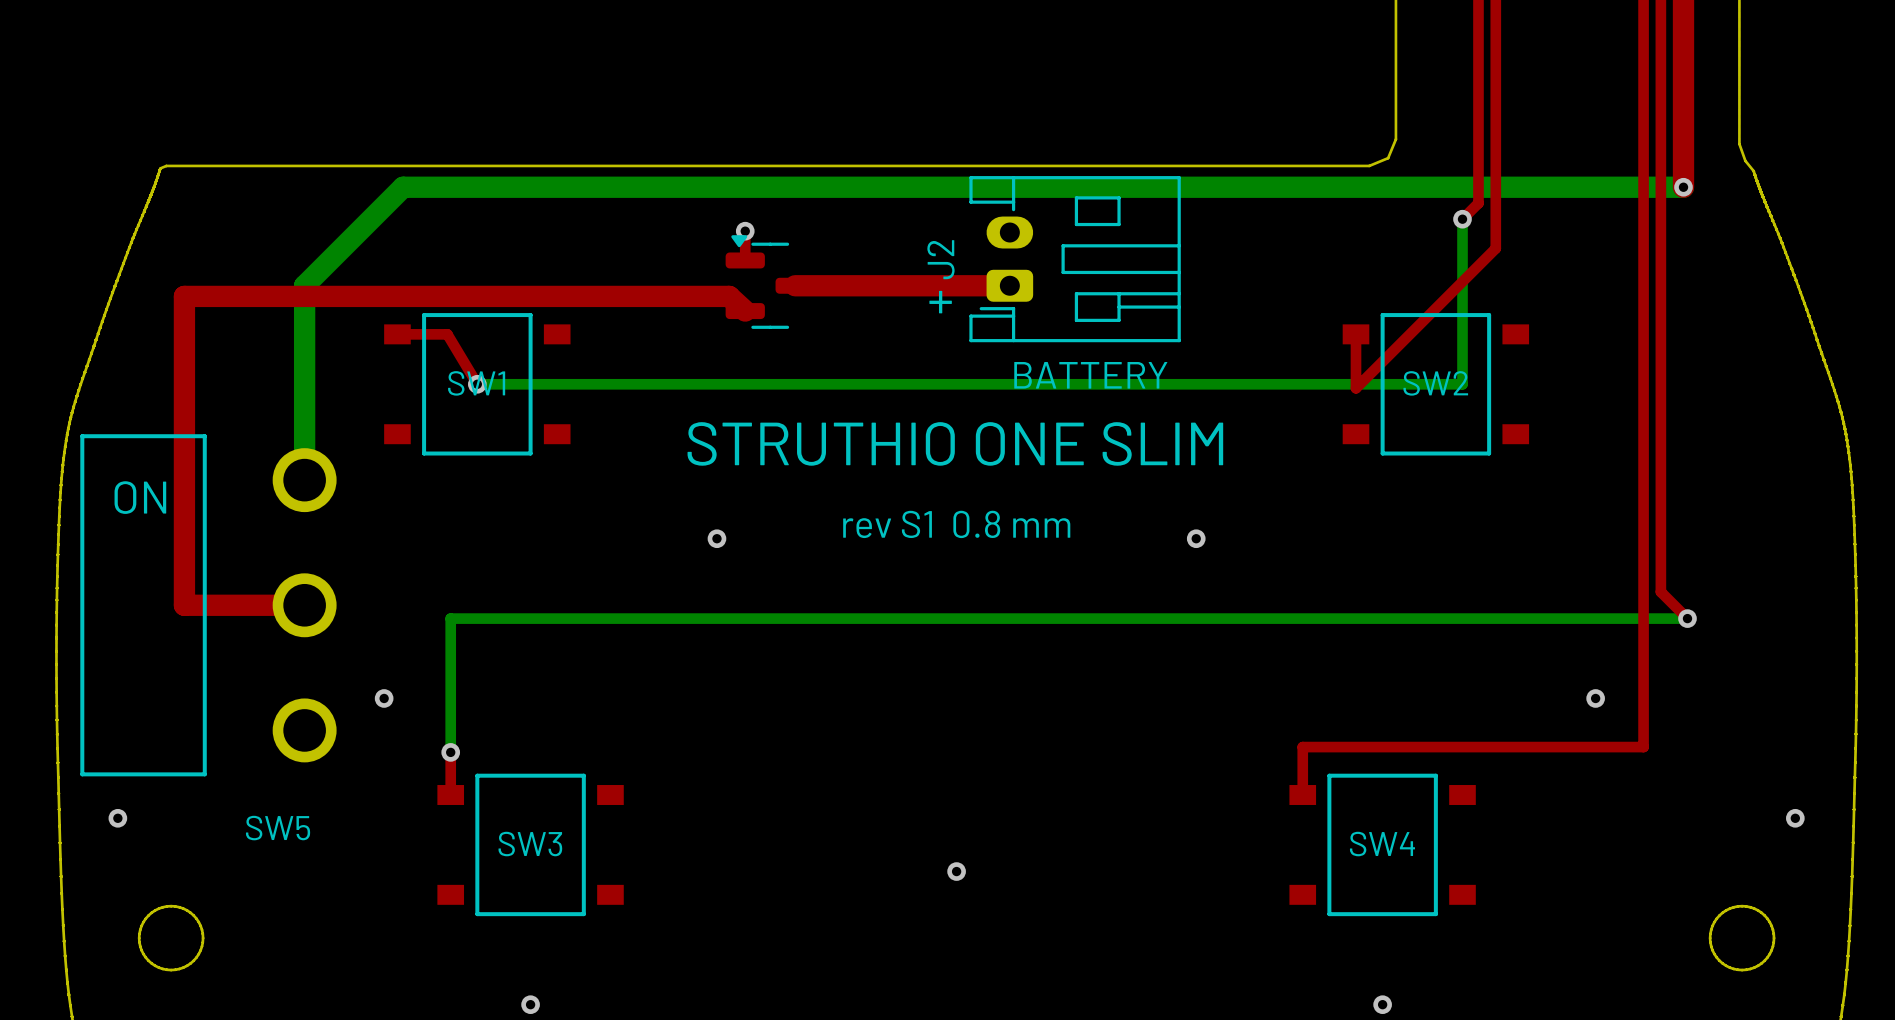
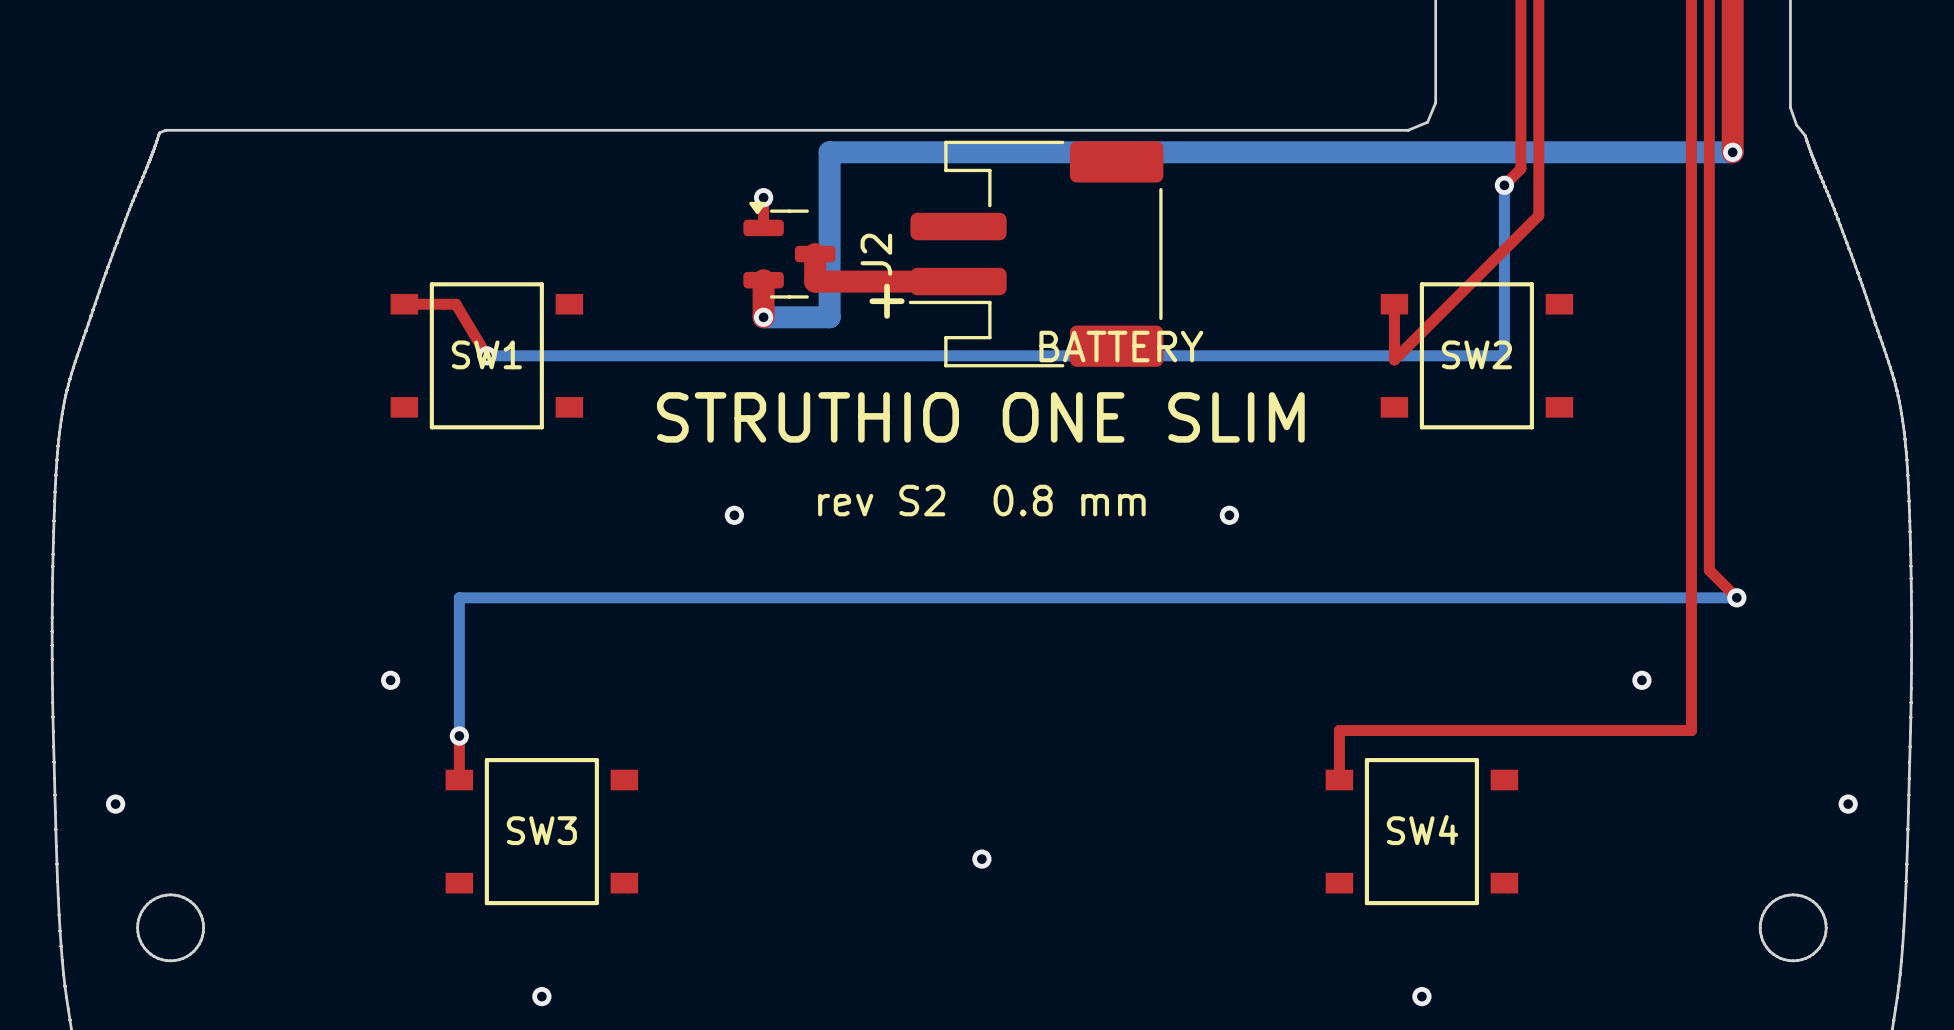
J2 footprint: [969, 176, 1181, 343] -> [908, 140, 1164, 368]
bottom track: (809, 187) (403, 187) (304, 285) (304, 480) -> (829, 152) (829, 317) (763, 317)
top track: (795, 285) (1009, 285) -> (815, 254) (815, 281) (958, 281)
text position: + (940, 302) -> + (887, 301)
top track: (745, 311) (729, 296) (184, 296) (184, 605) (304, 605) -> (763, 280) (763, 317)
via: none -> (763, 317)
line: (82, 436) (82, 774) (204, 774) (204, 436) (82, 436) -> none
text: ON (140, 497) -> none
text: rev S1 0.8 mm (956, 524) -> rev S2 0.8 mm (981, 500)
SW5: (304, 605) -> none

